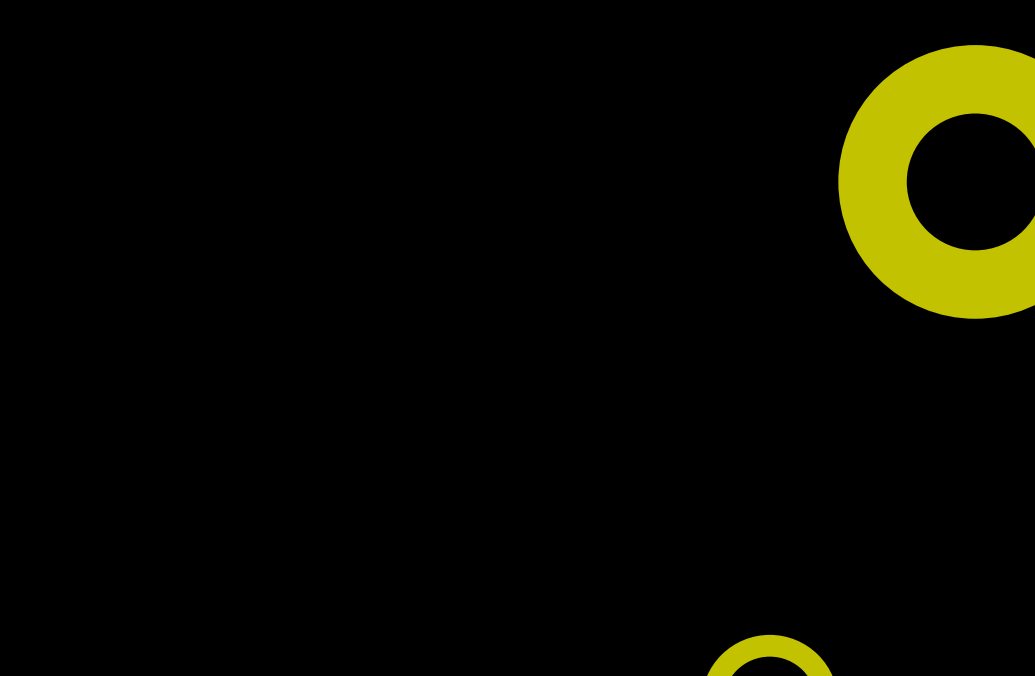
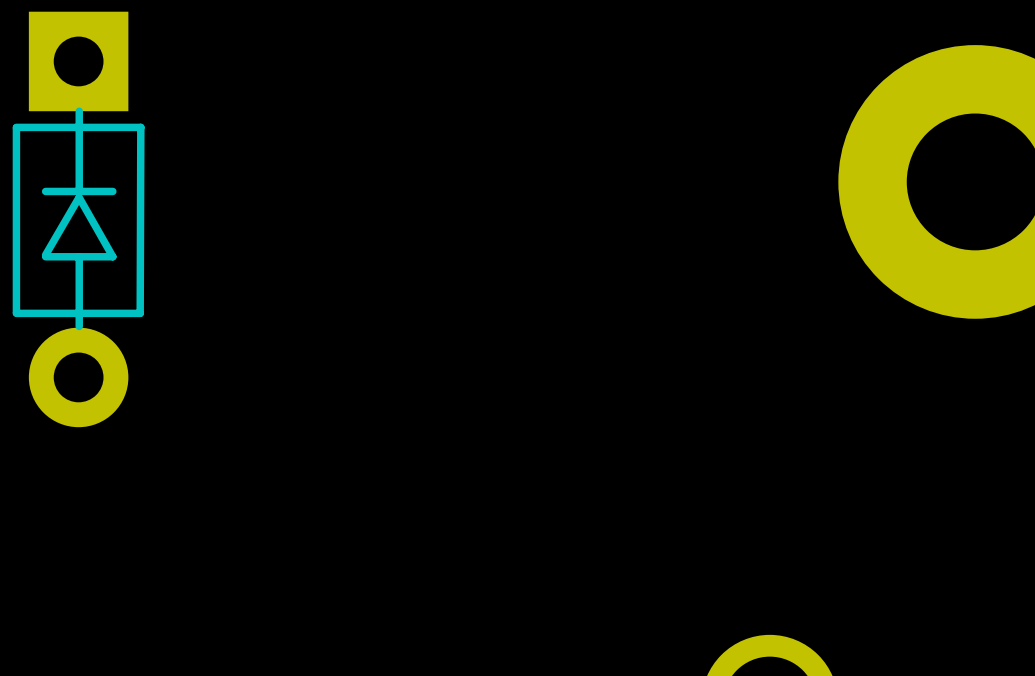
part: none -> (78, 219)

